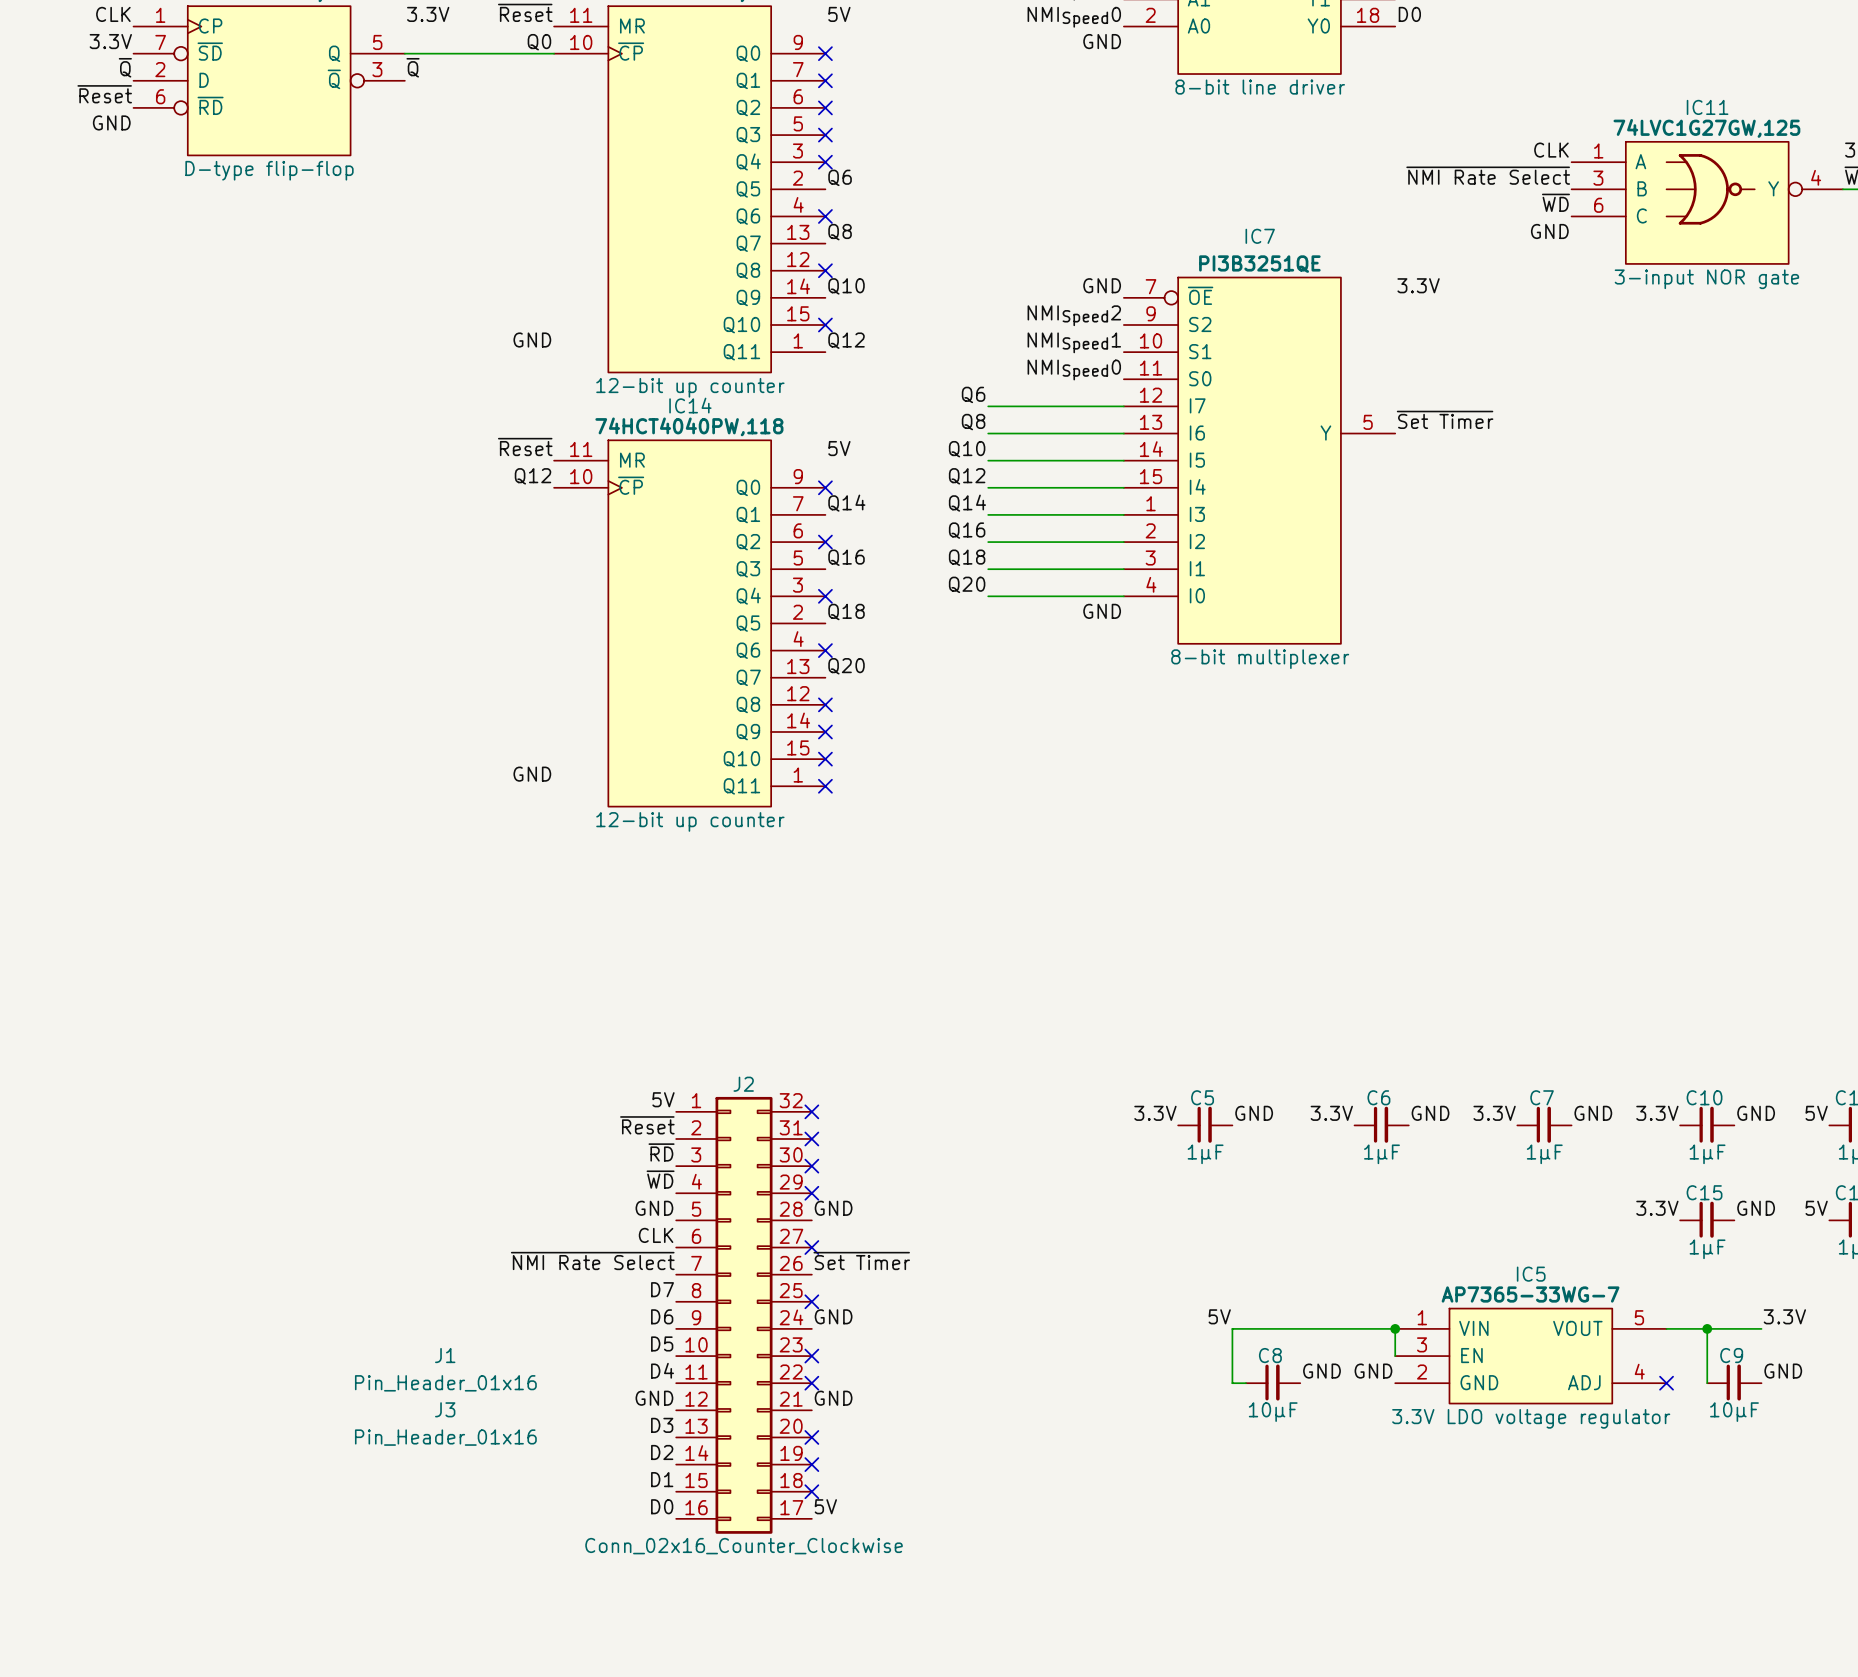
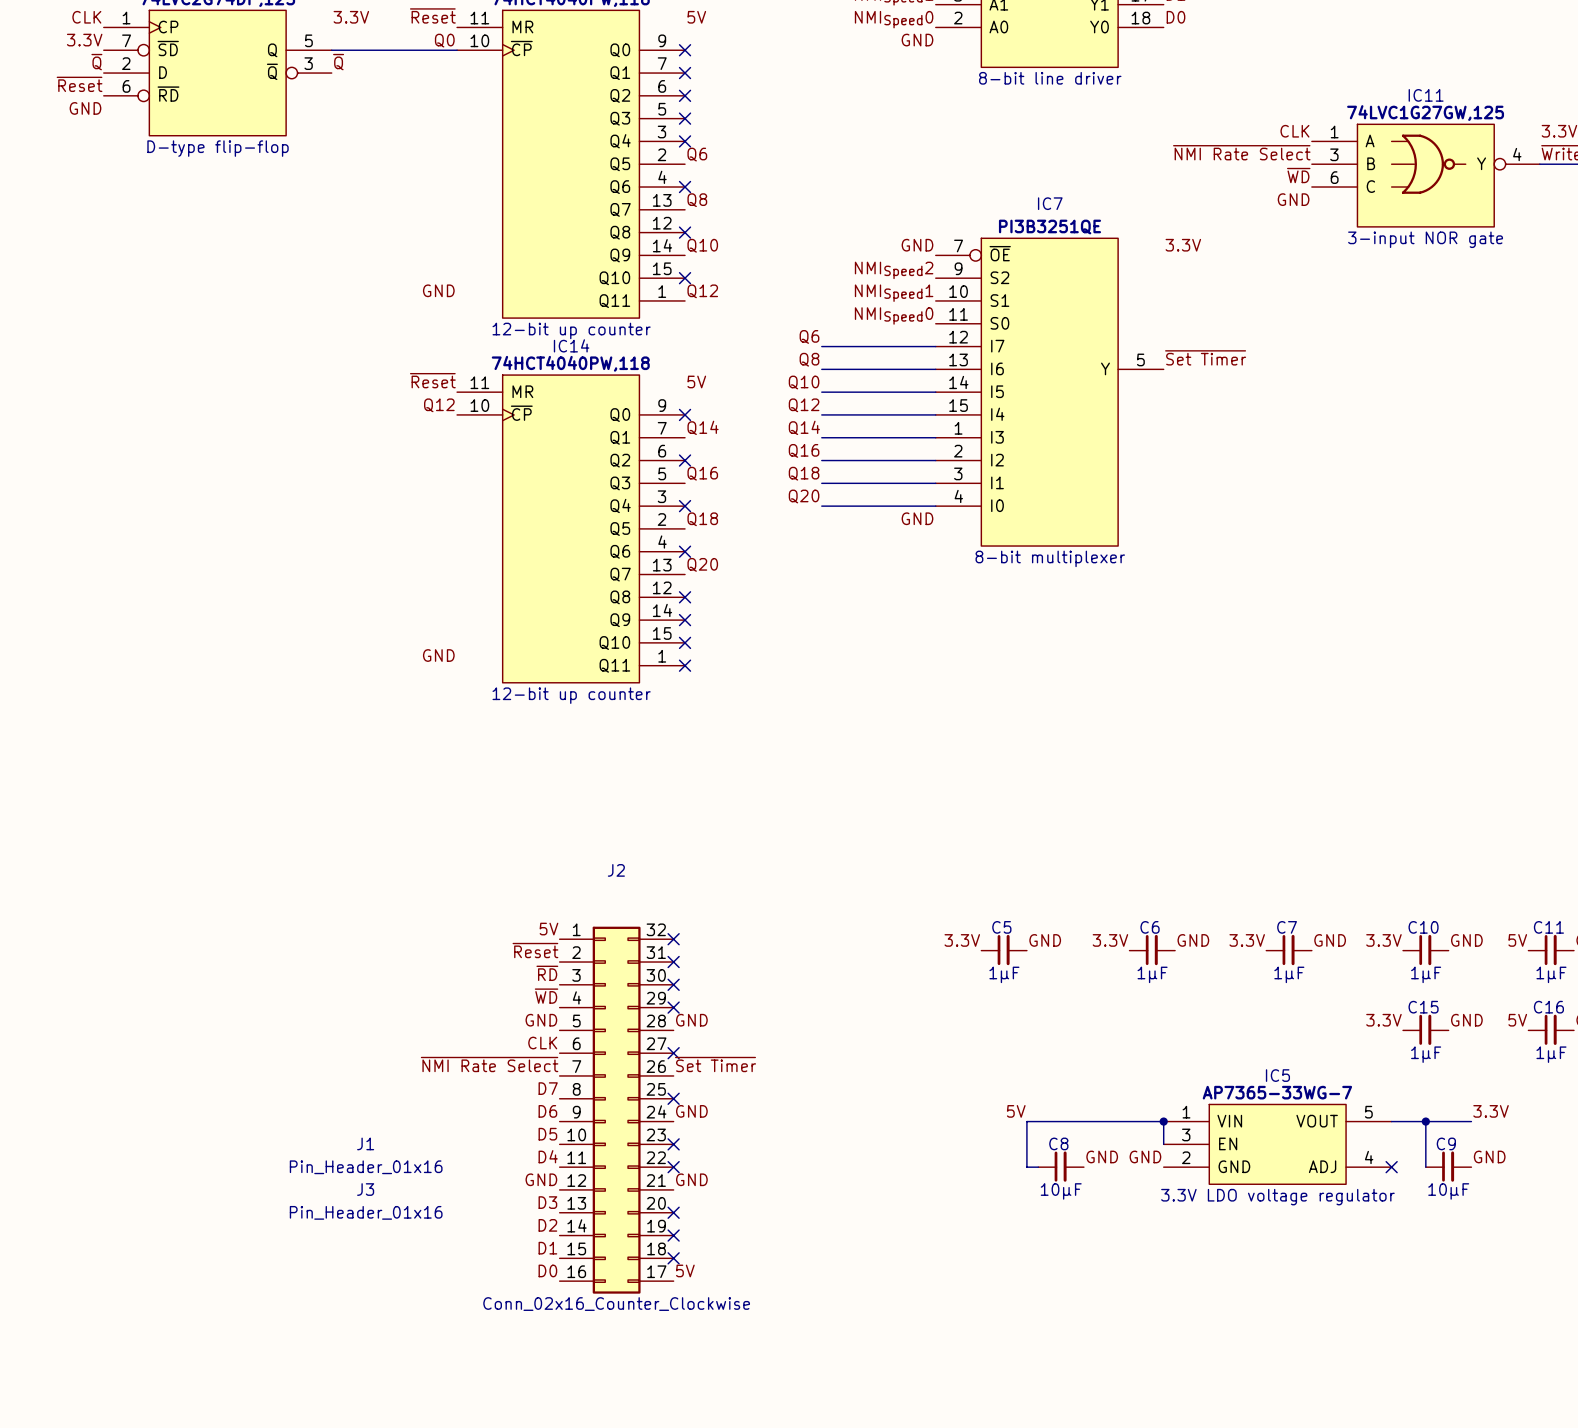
J2 name position: J2 (743, 1084) -> J2 (616, 870)

